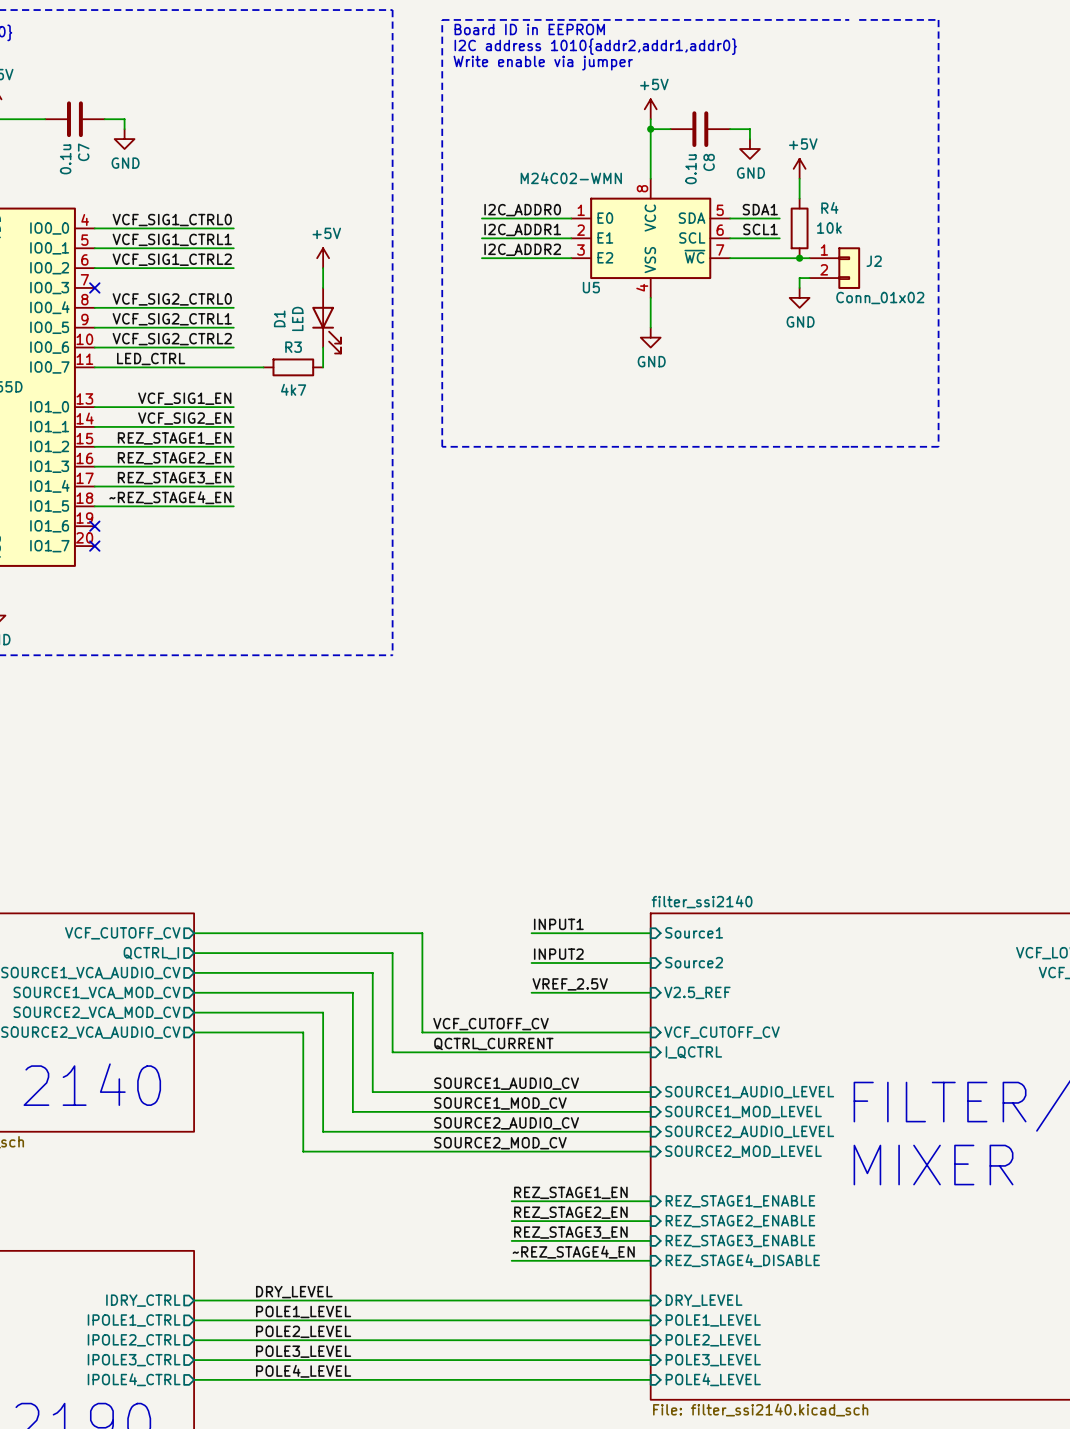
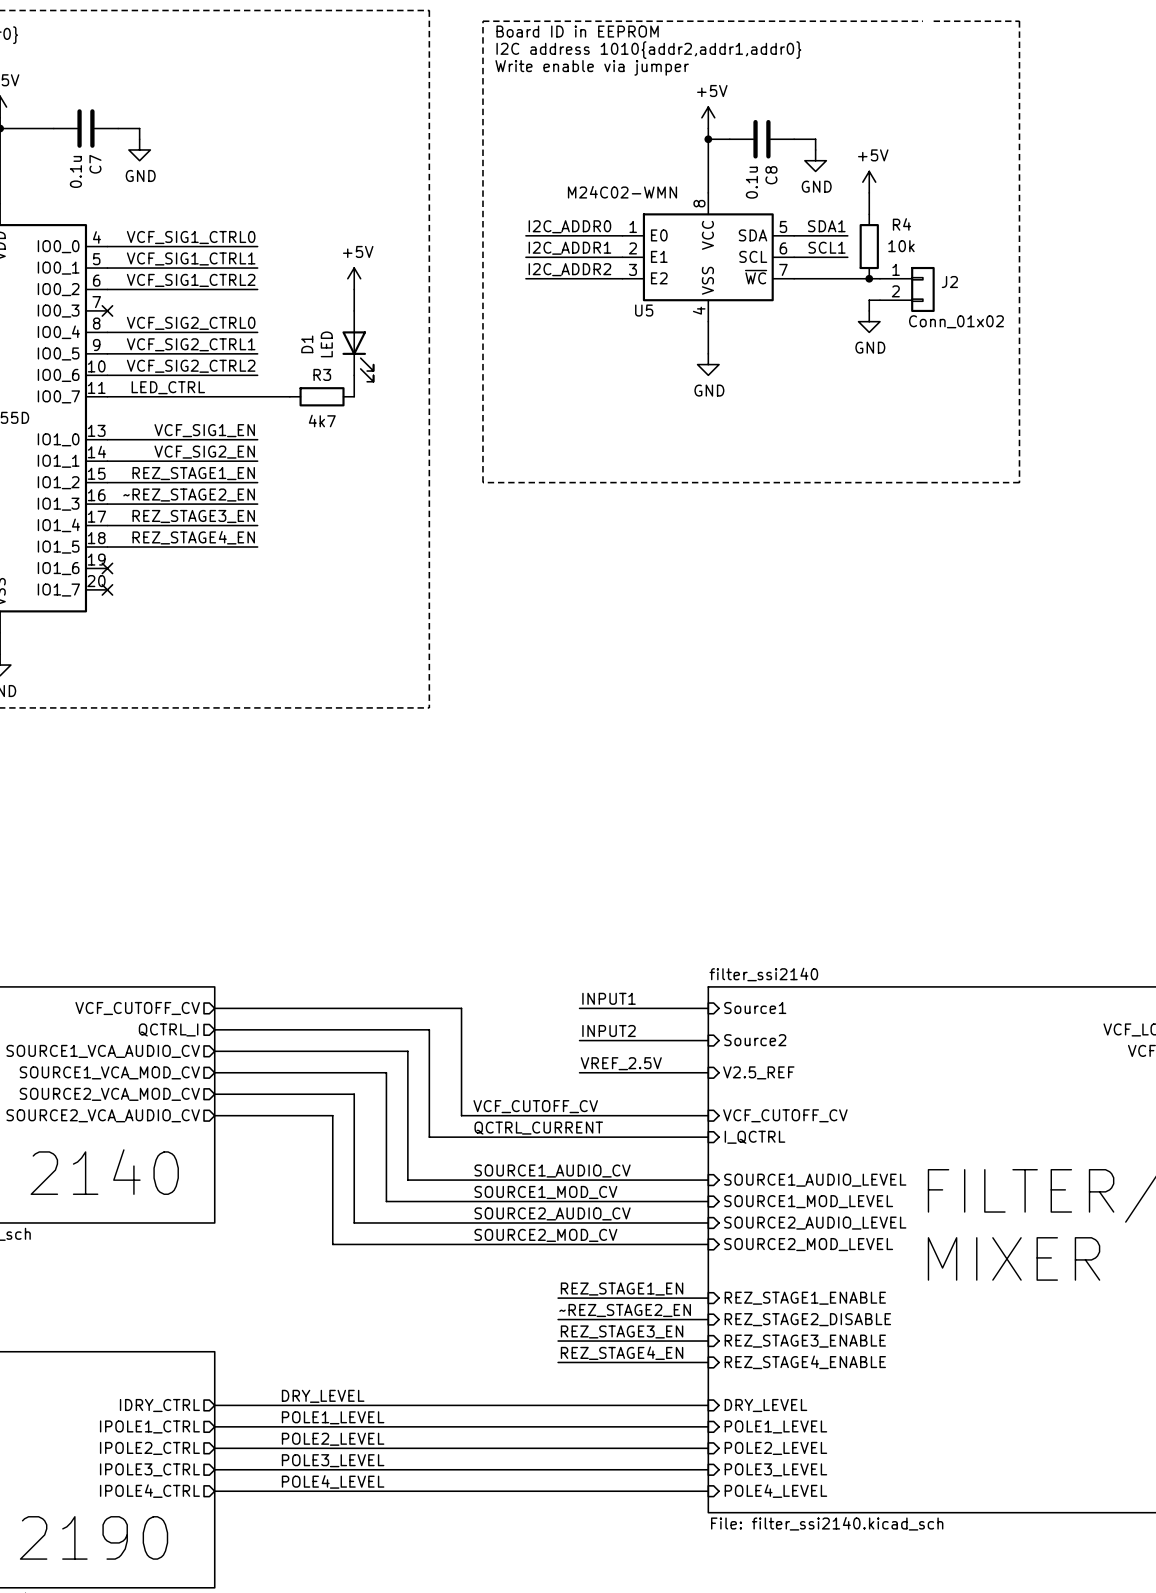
label: REZ_STAGE2_EN (174, 458) -> ~REZ_STAGE2_EN (189, 495)
label: ~REZ_STAGE4_EN (170, 497) -> REZ_STAGE4_EN (193, 537)
label: REZ_STAGE2_EN (570, 1212) -> ~REZ_STAGE2_EN (625, 1310)
sheet pin: REZ_STAGE2_ENABLE (740, 1221) -> REZ_STAGE2_DISABLE (807, 1319)
label: ~REZ_STAGE4_EN (573, 1252) -> REZ_STAGE4_EN (622, 1353)
sheet pin: REZ_STAGE4_DISABLE (742, 1260) -> REZ_STAGE4_ENABLE (805, 1362)

